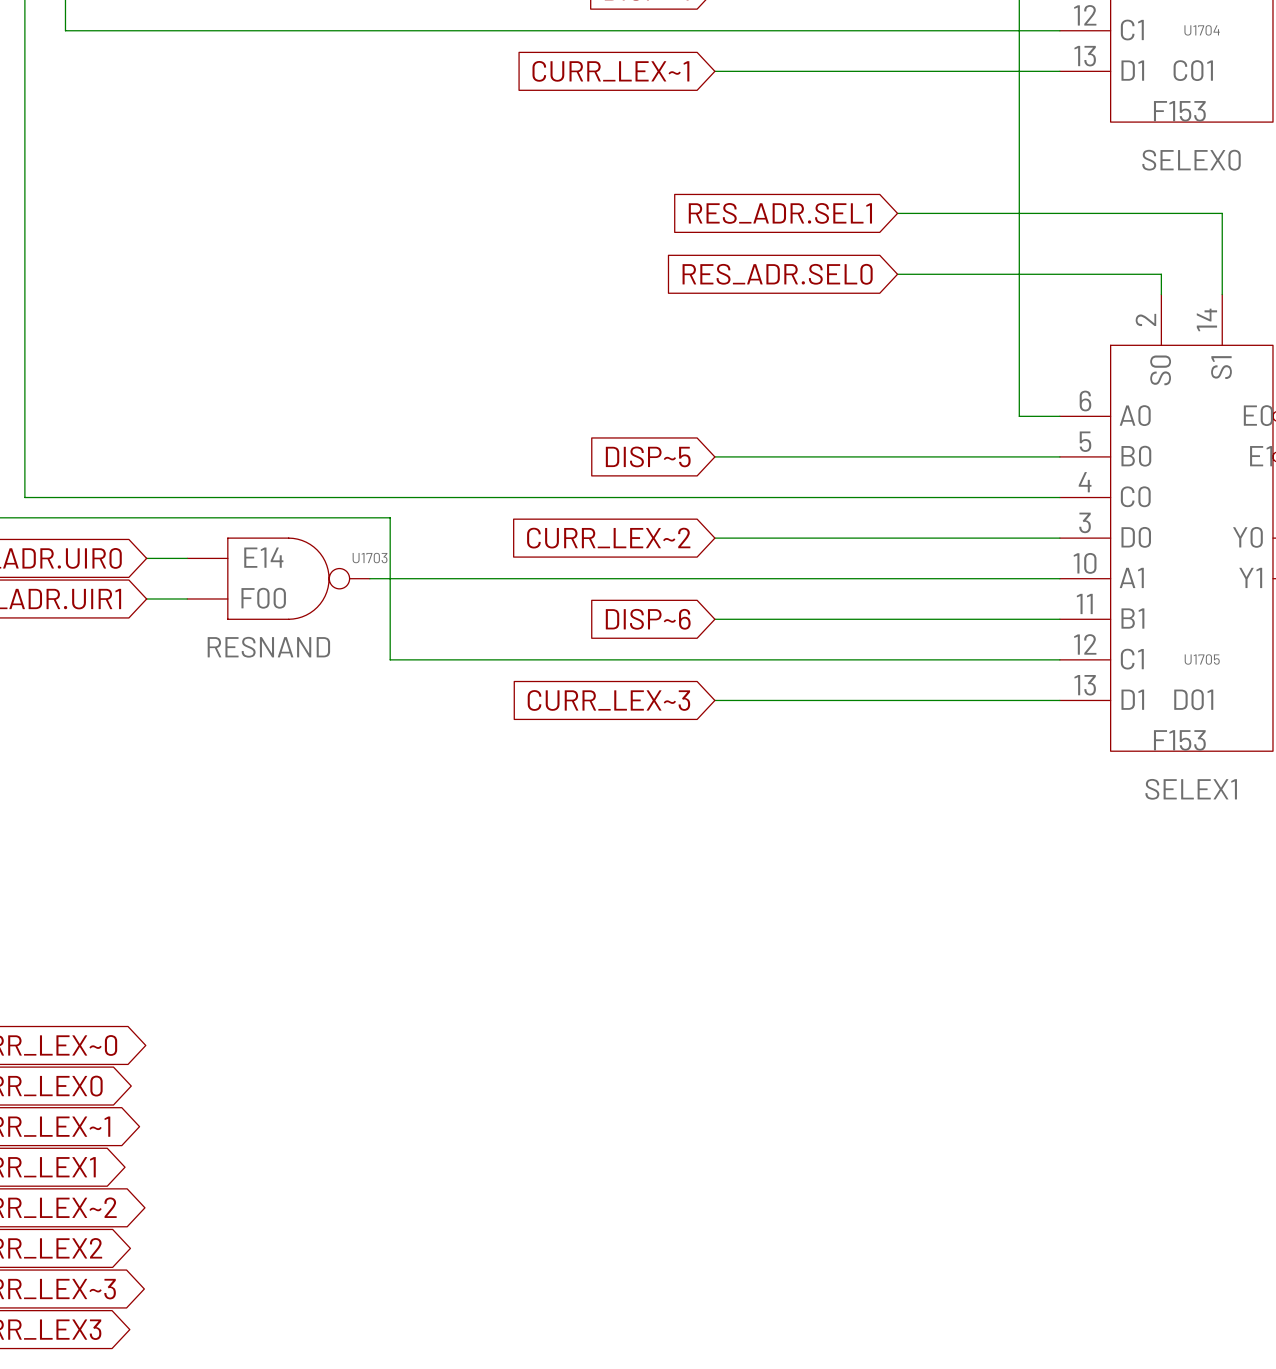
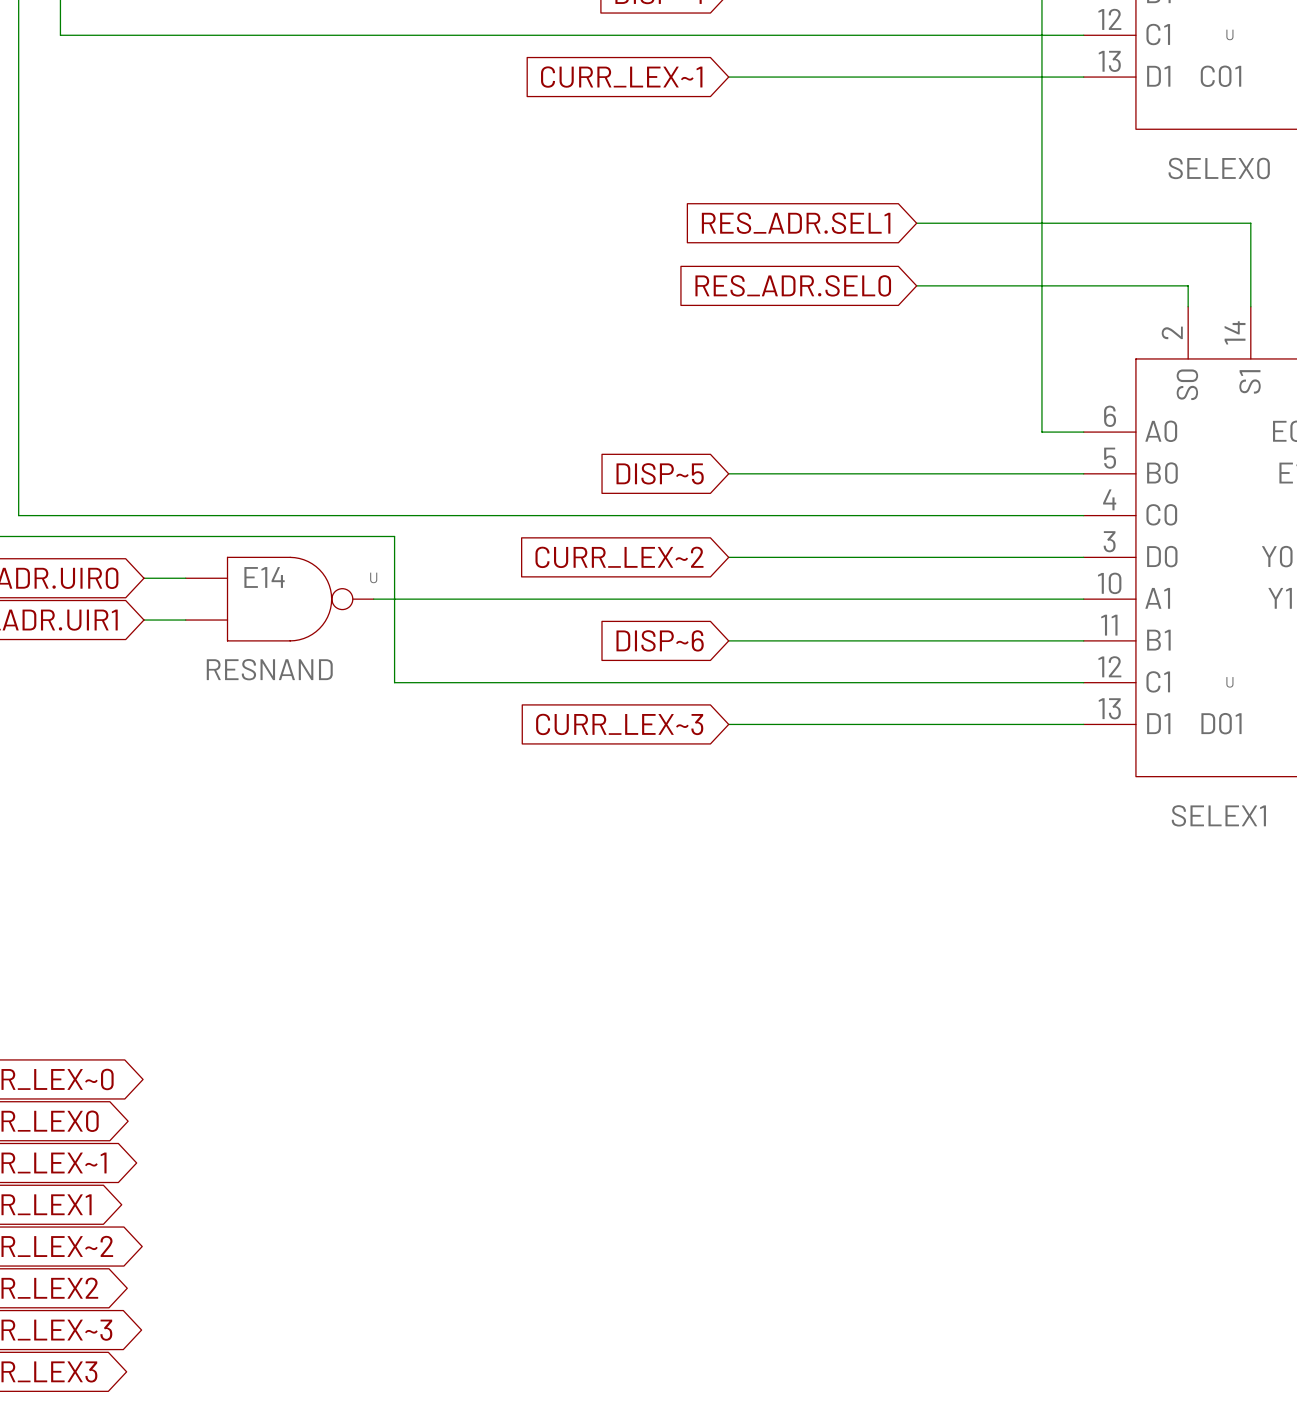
U1704 name: U1704 (1202, 30) -> U (1229, 34)
U1704 value: F153 (1179, 111) -> none
U1703 name: U1703 (370, 558) -> U (373, 577)
U1703 value: F00 (263, 598) -> none
U1705 name: U1705 (1202, 659) -> U (1229, 682)
U1705 value: F153 (1179, 740) -> none

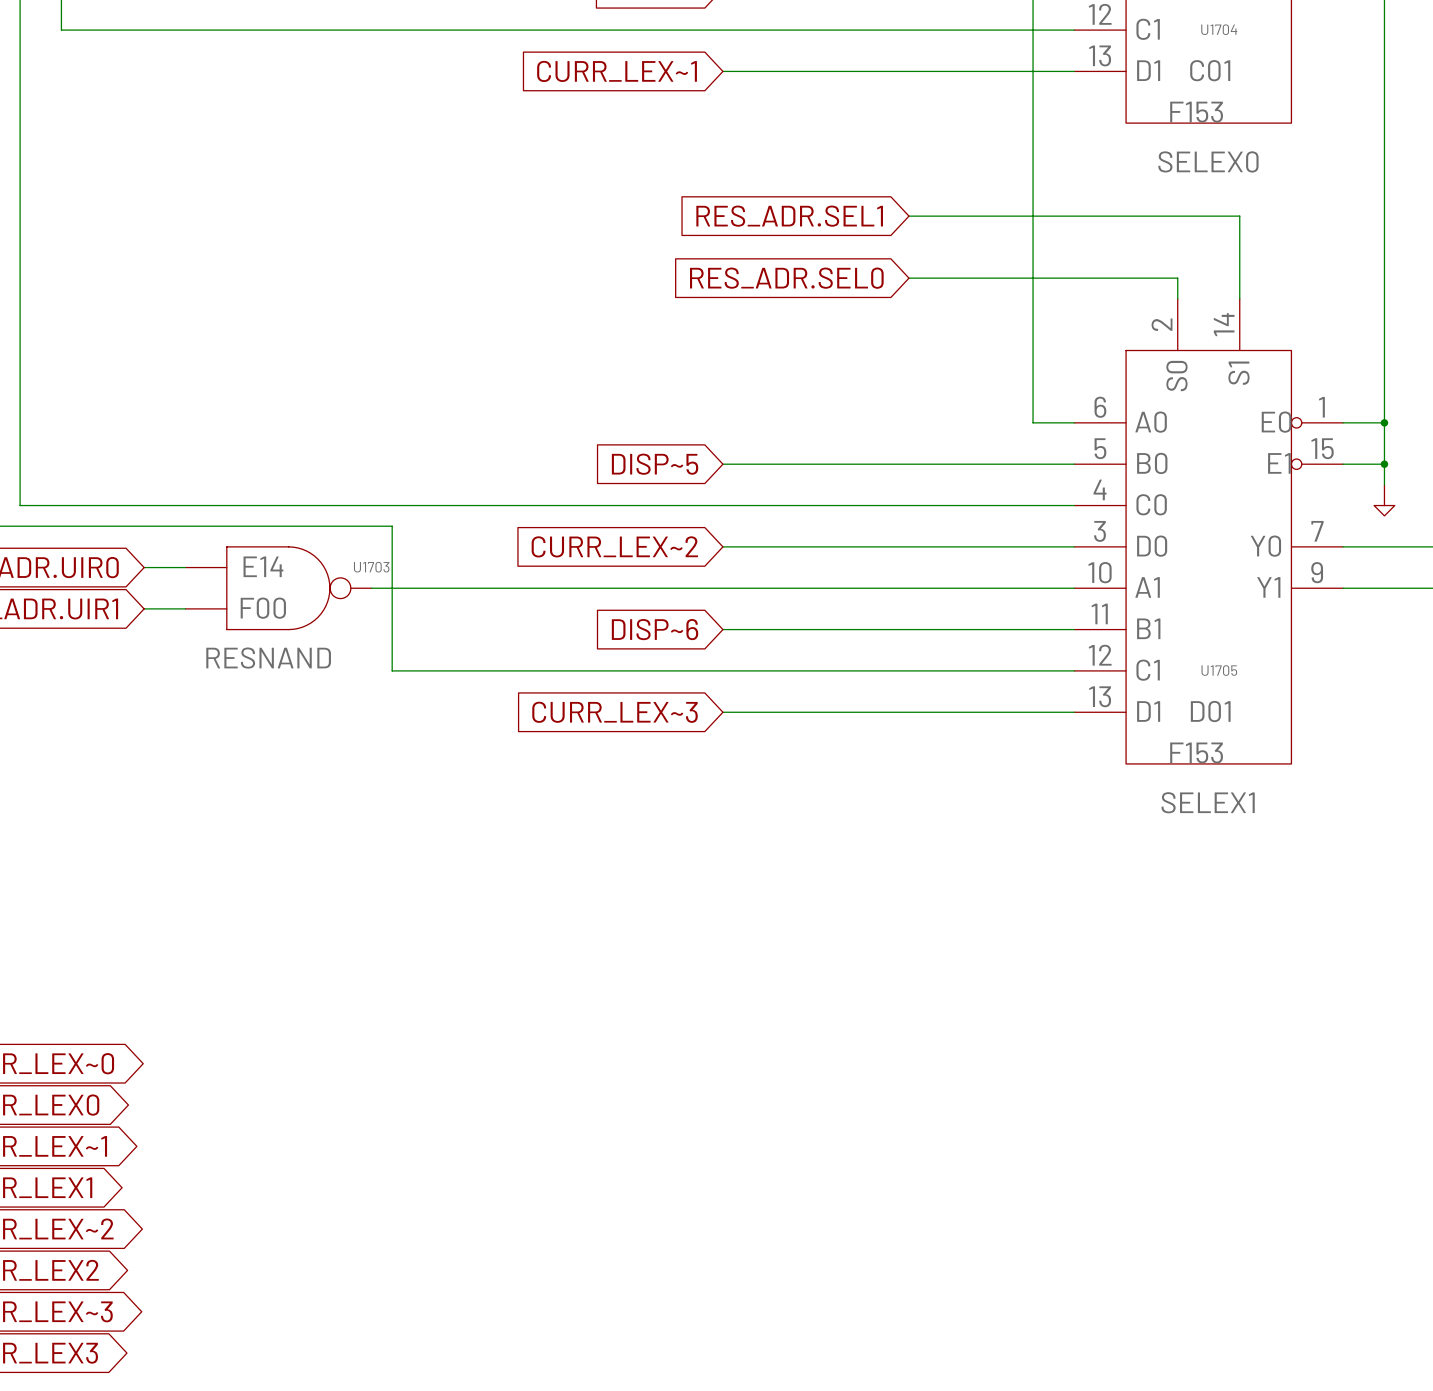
U name: U (1229, 34) -> U1704 (1219, 29)
U value: none -> F153 (1196, 112)
U name: U (373, 577) -> U1703 (371, 567)
U value: none -> F00 (263, 608)
U name: U (1229, 682) -> U1705 (1219, 670)
U value: none -> F153 (1196, 752)

